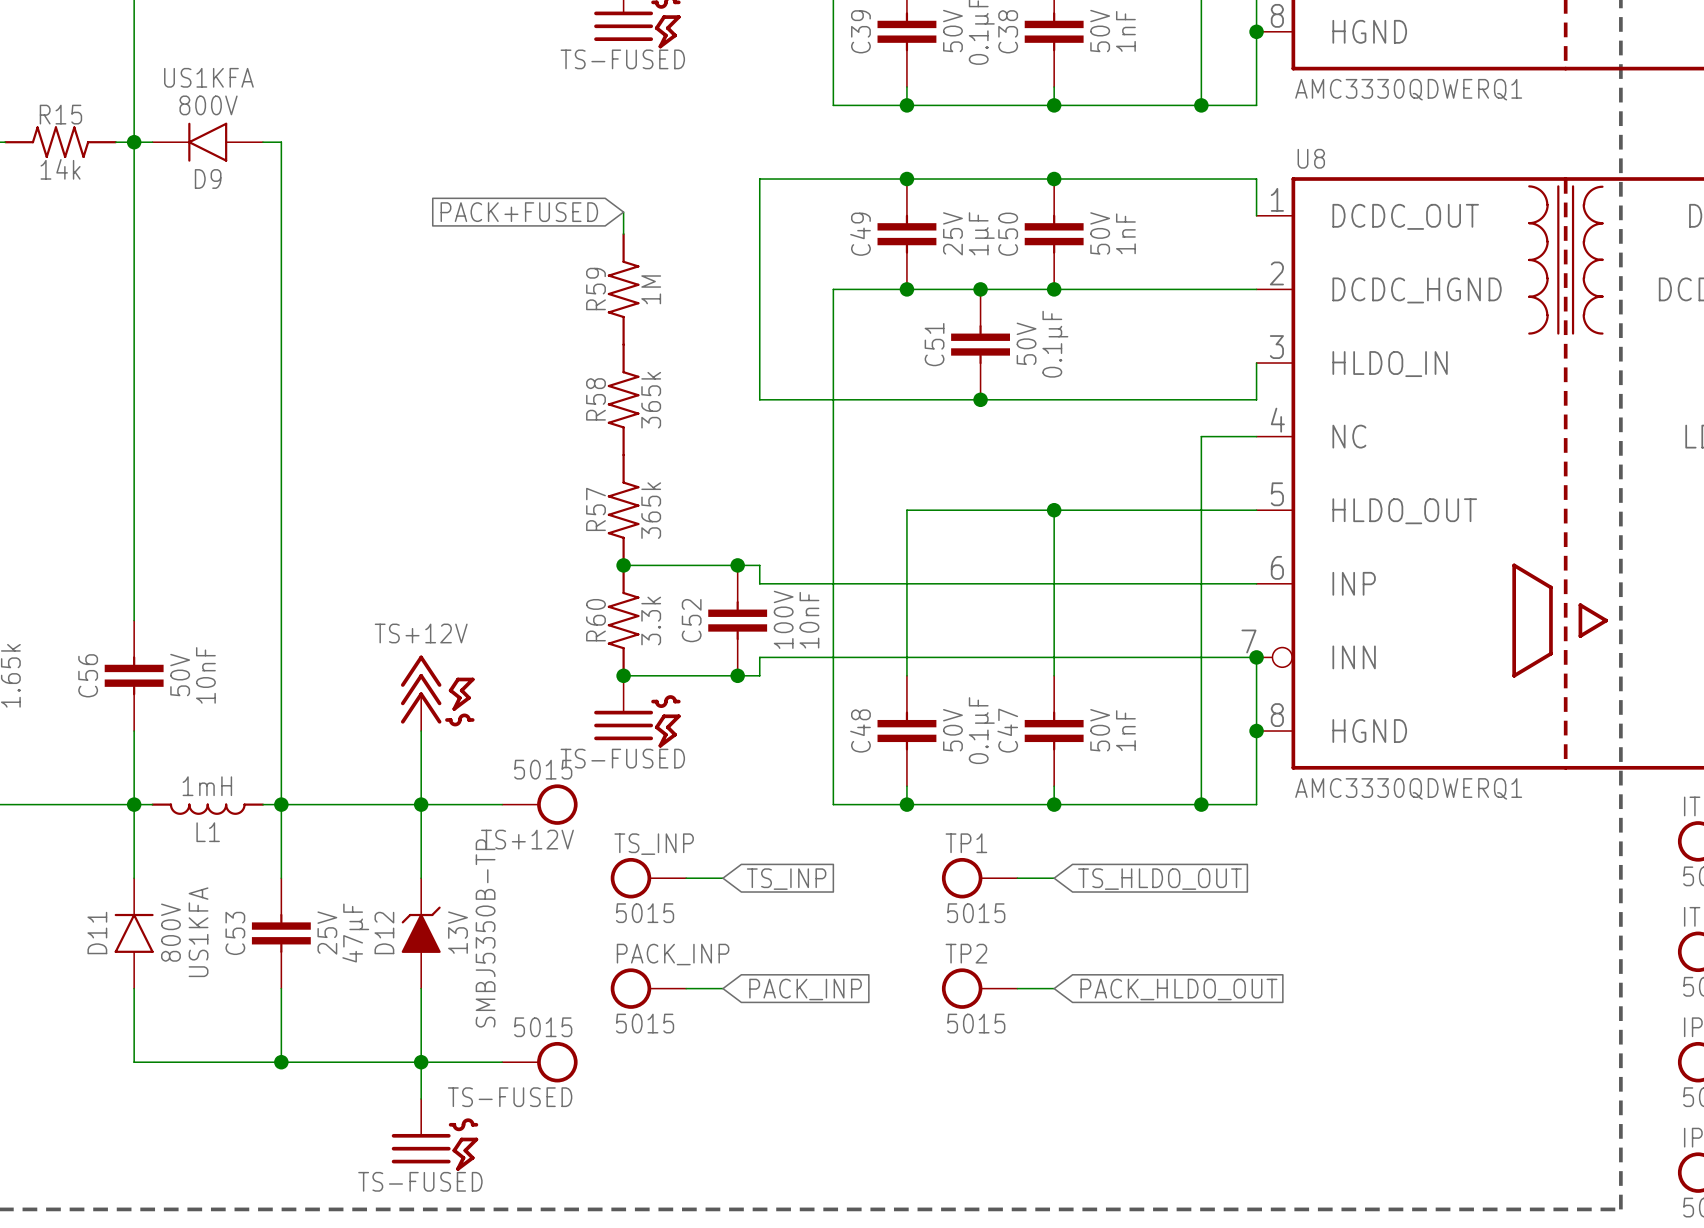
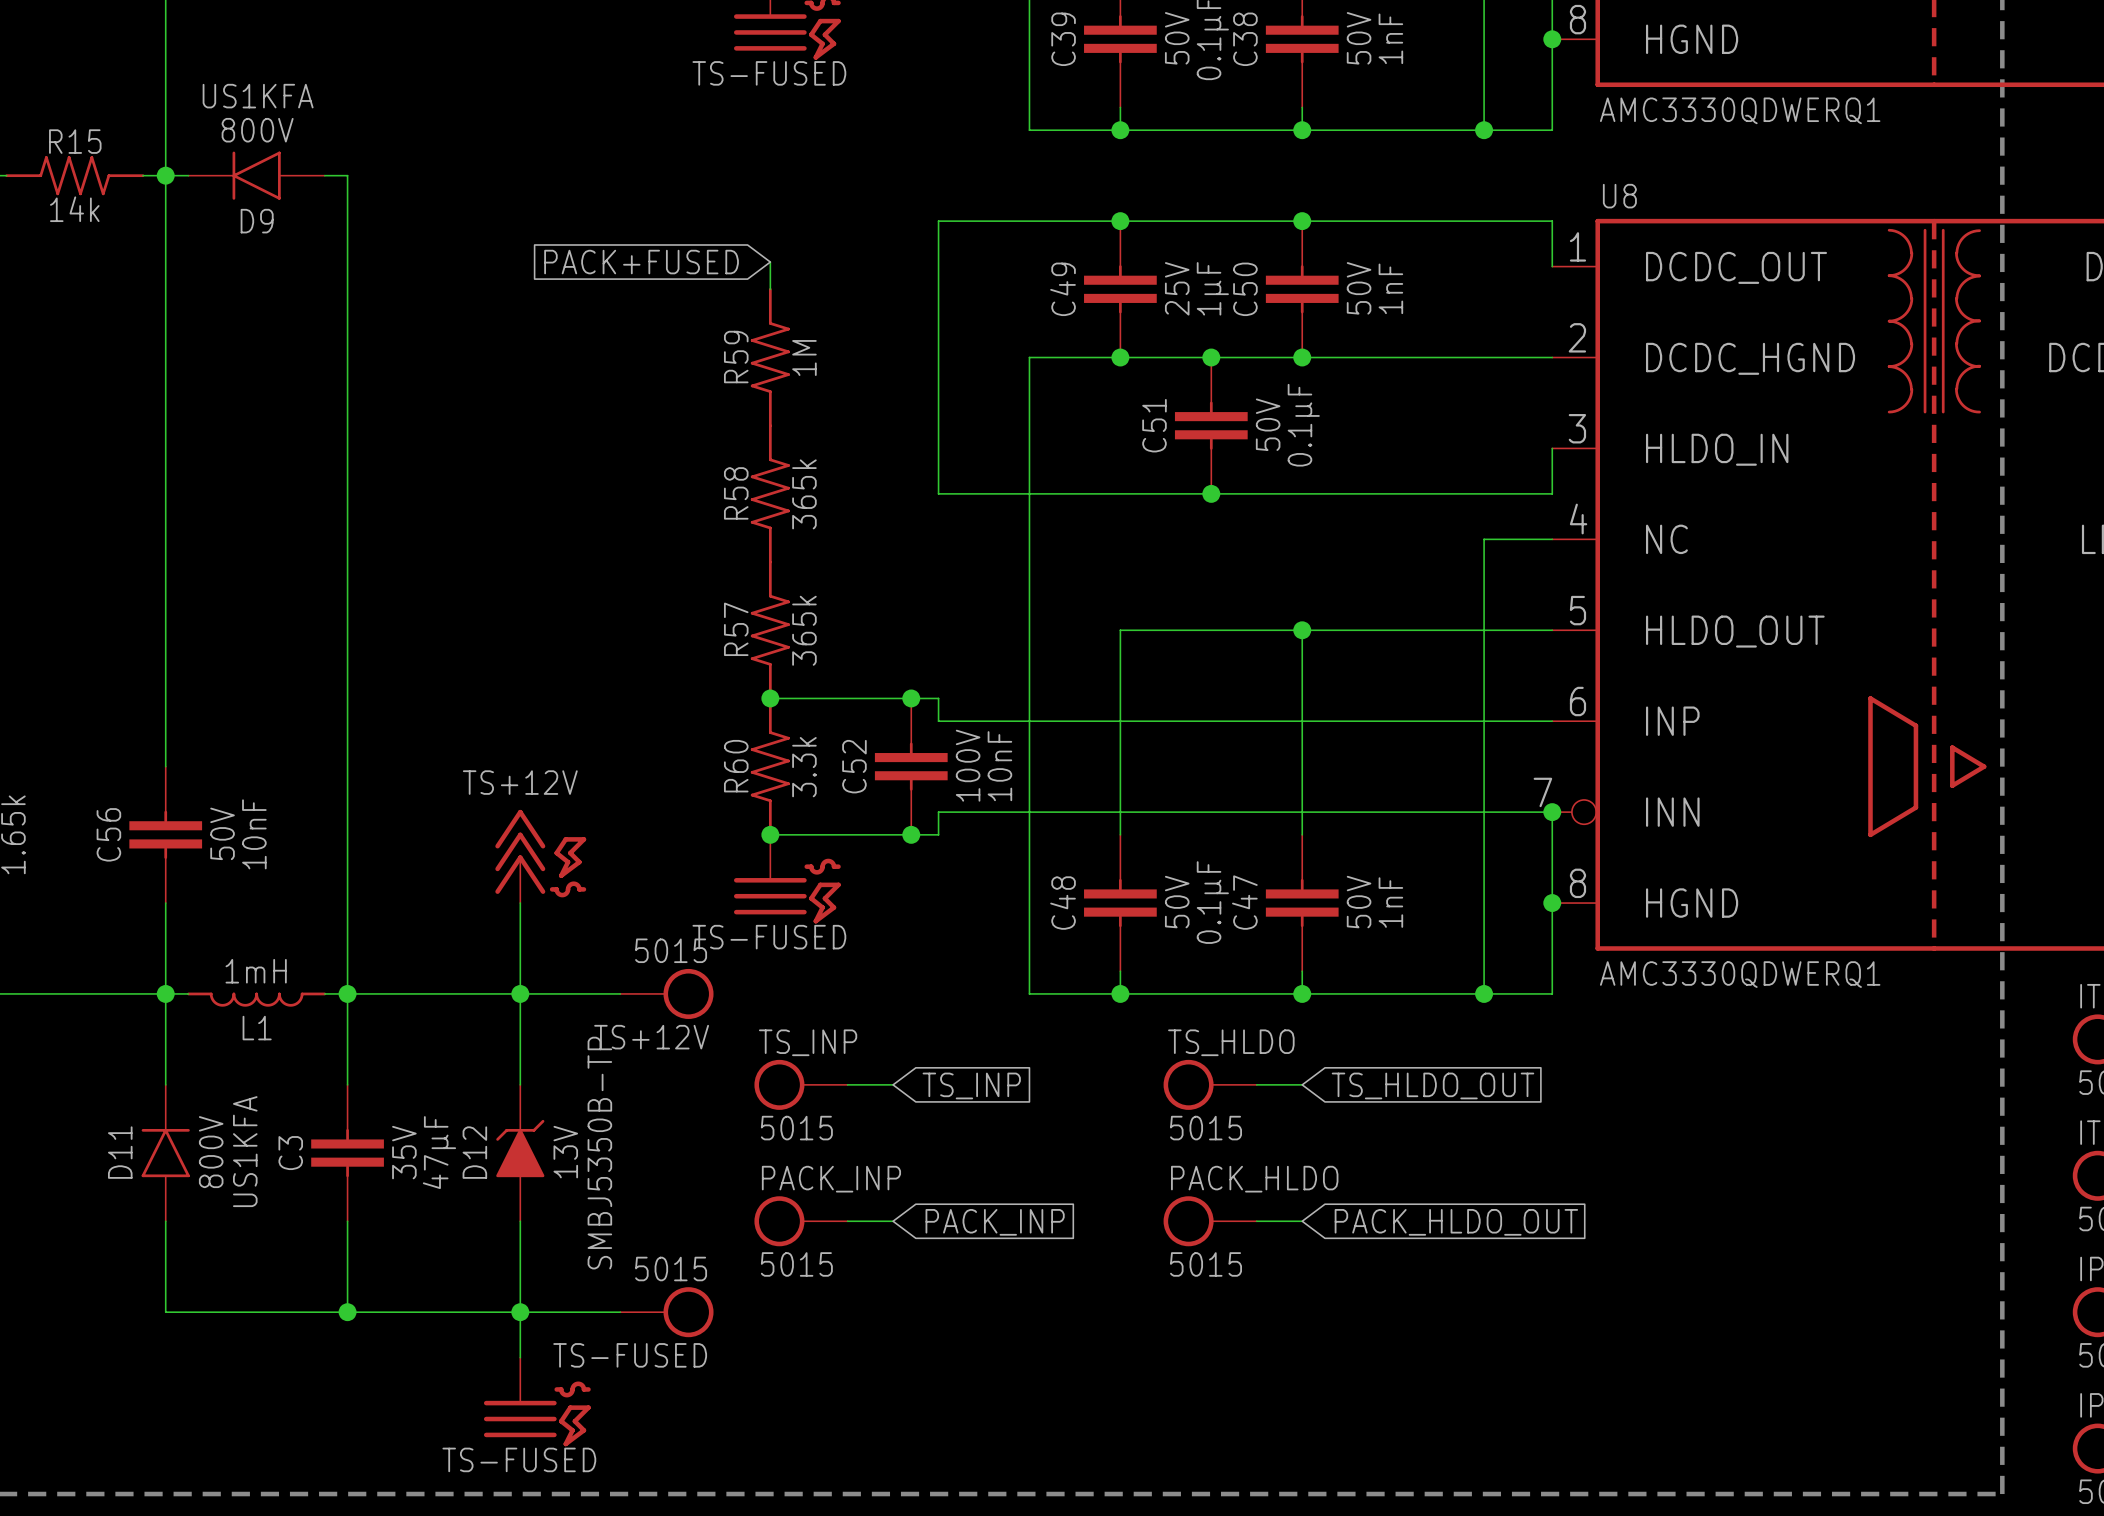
TP1 name: TP1 (966, 843) -> TS_HLDO (1231, 1042)
C53 name: C53 (235, 933) -> C3 (290, 1153)
C53 text: 25V (327, 933) -> 35V (404, 1152)
TP2 name: TP2 (966, 953) -> PACK_HLDO (1254, 1179)

